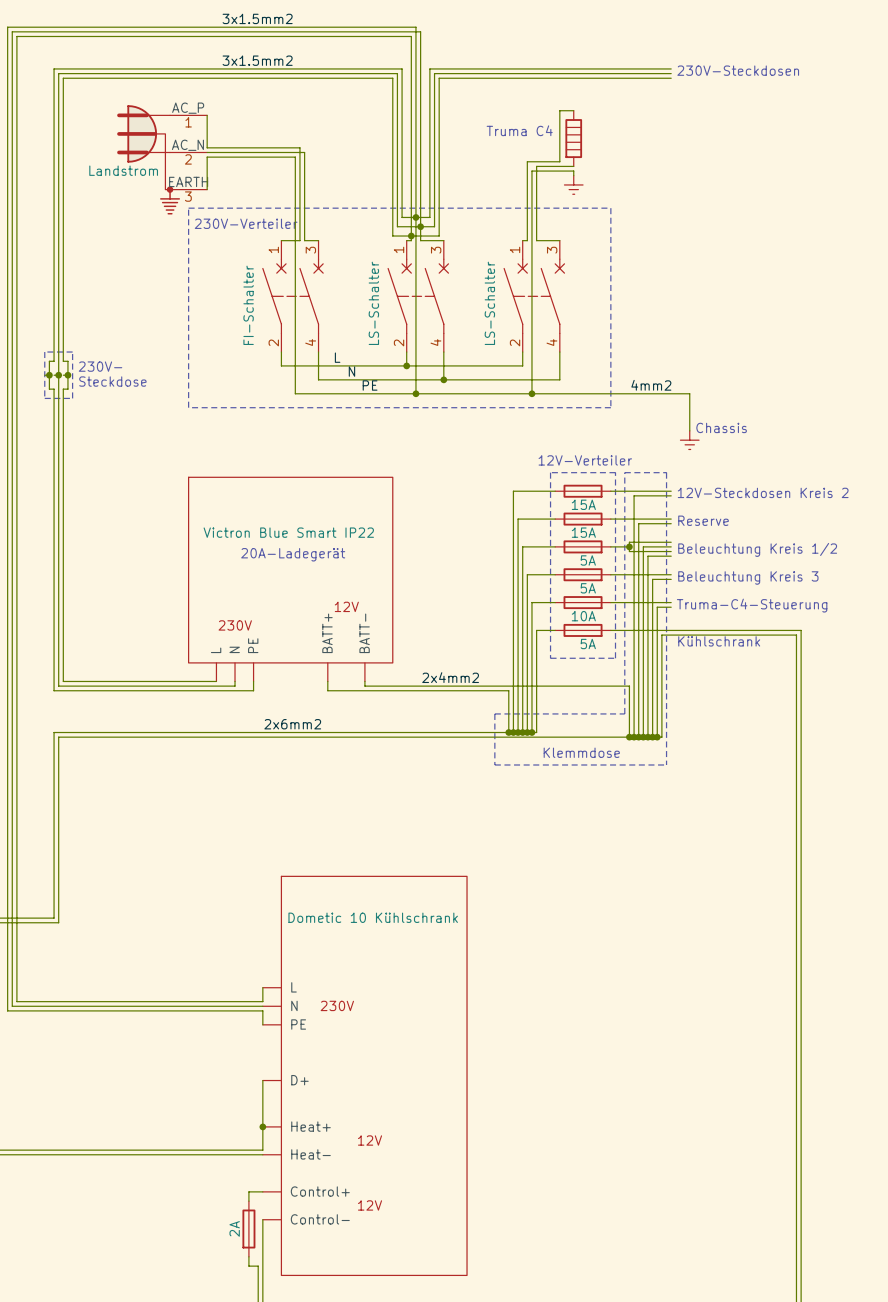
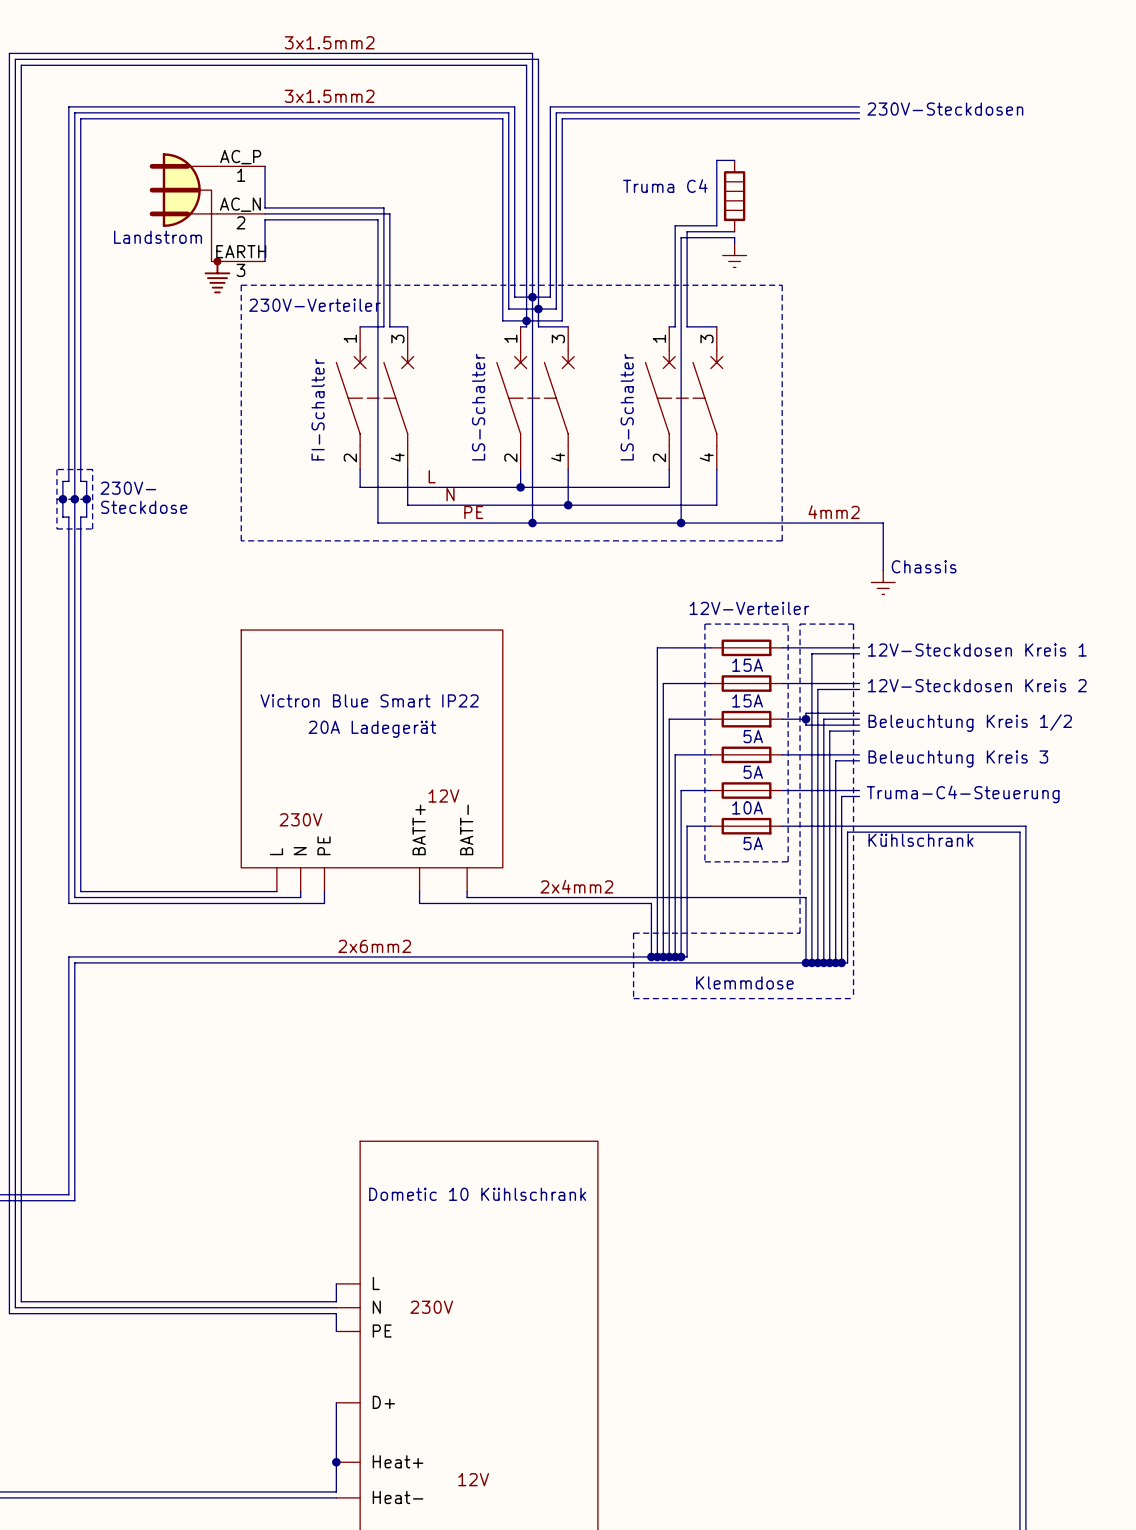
text: 12V-Steckdosen Kreis 2 (763, 492) -> 12V-Steckdosen Kreis 1 (977, 650)
text: Reserve (703, 520) -> 12V-Steckdosen Kreis 2 (977, 685)
text: 20A-Ladegerät (293, 554) -> 20A Ladegerät (372, 729)

